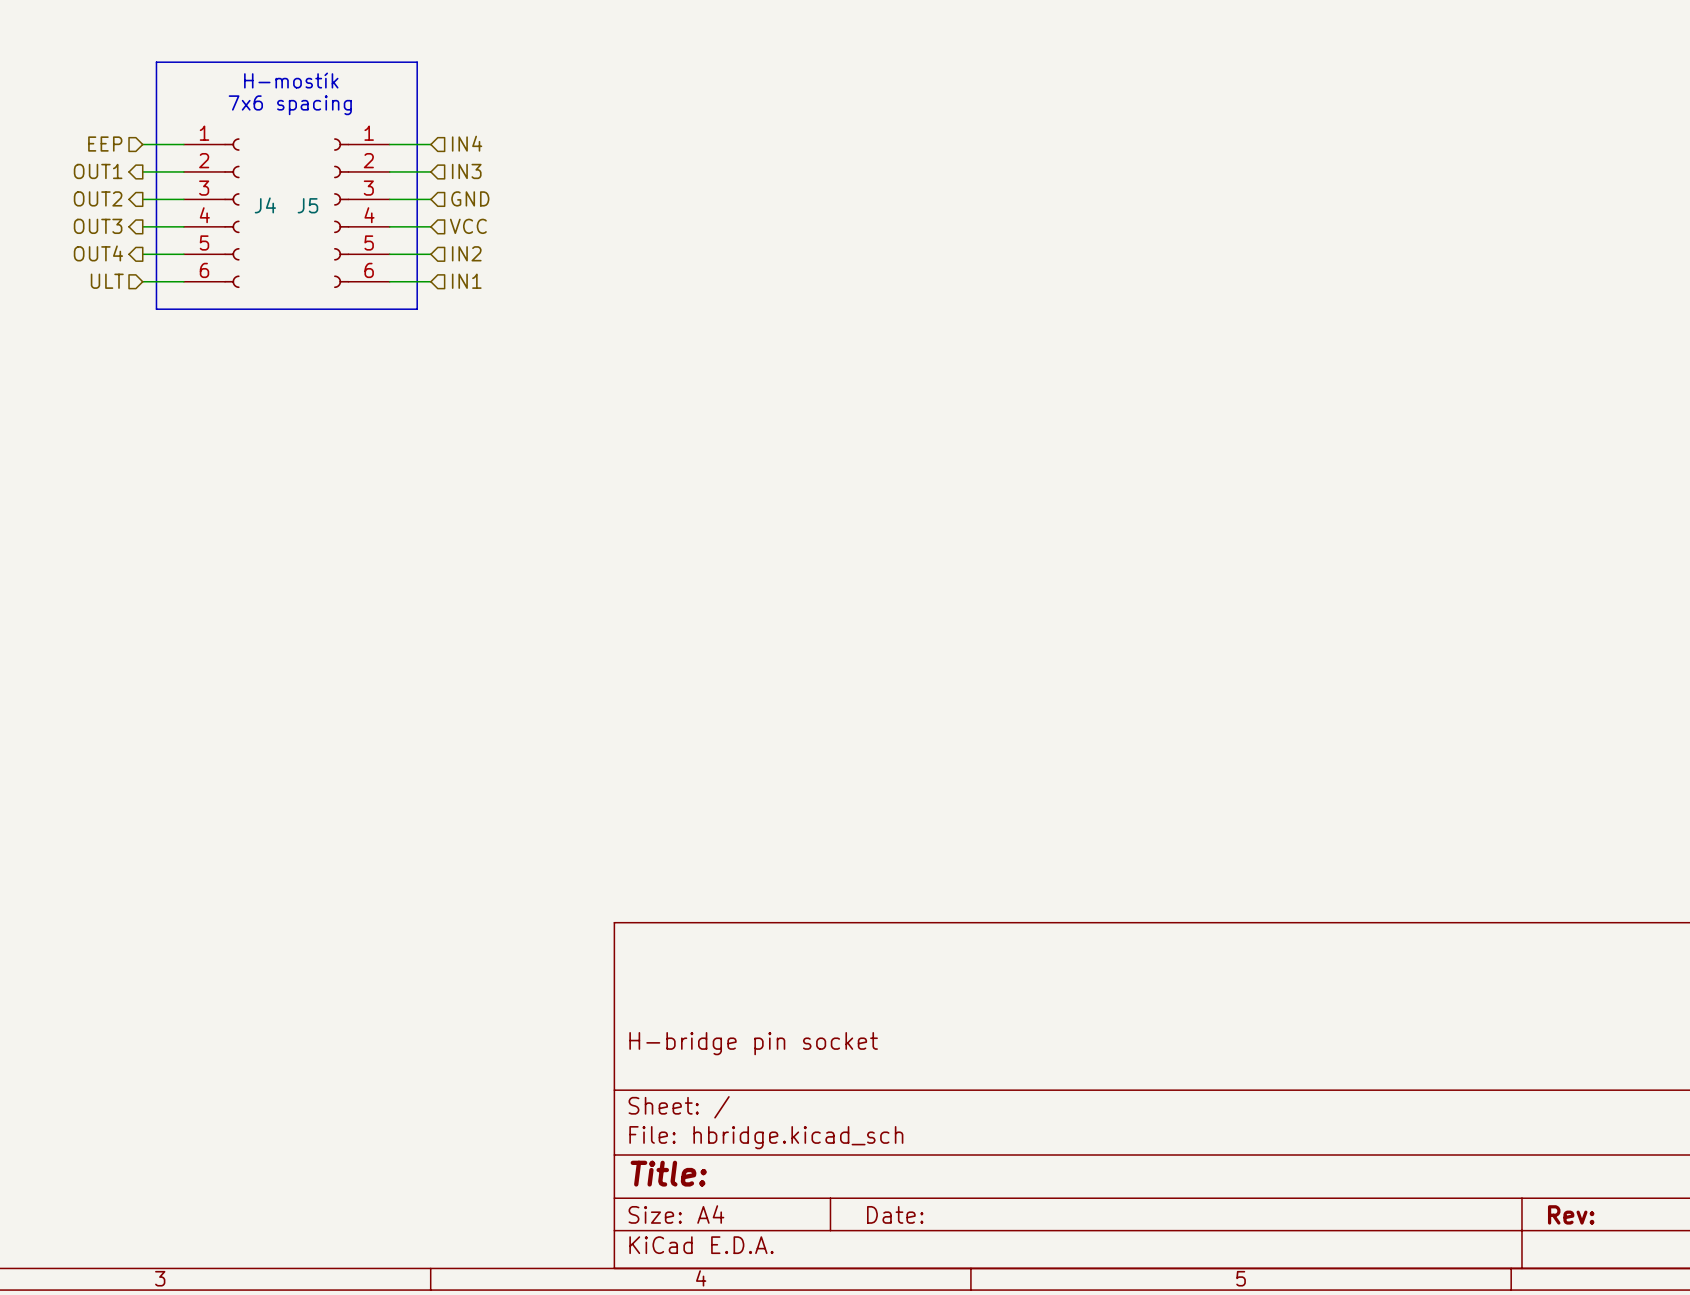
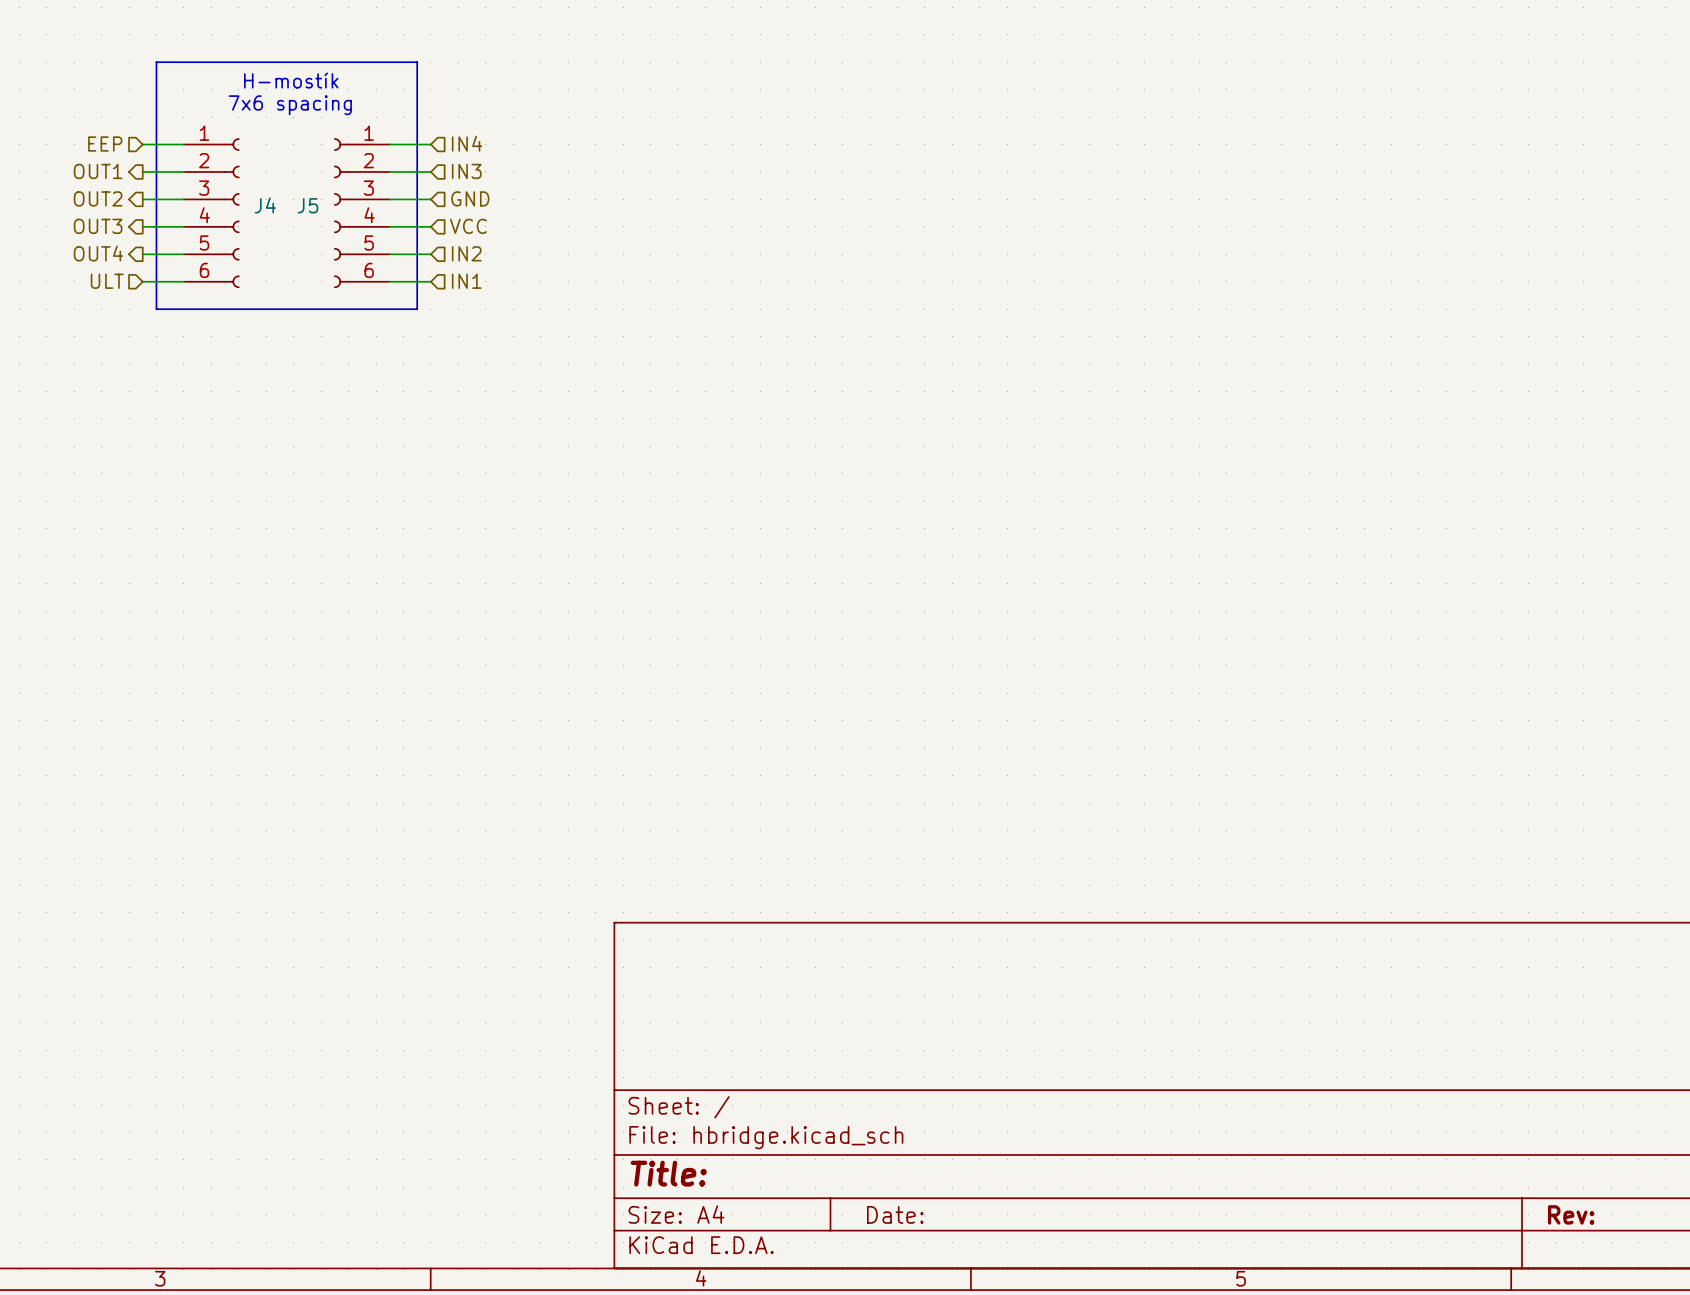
title block: H-bridge pin socket (753, 1043) -> none

